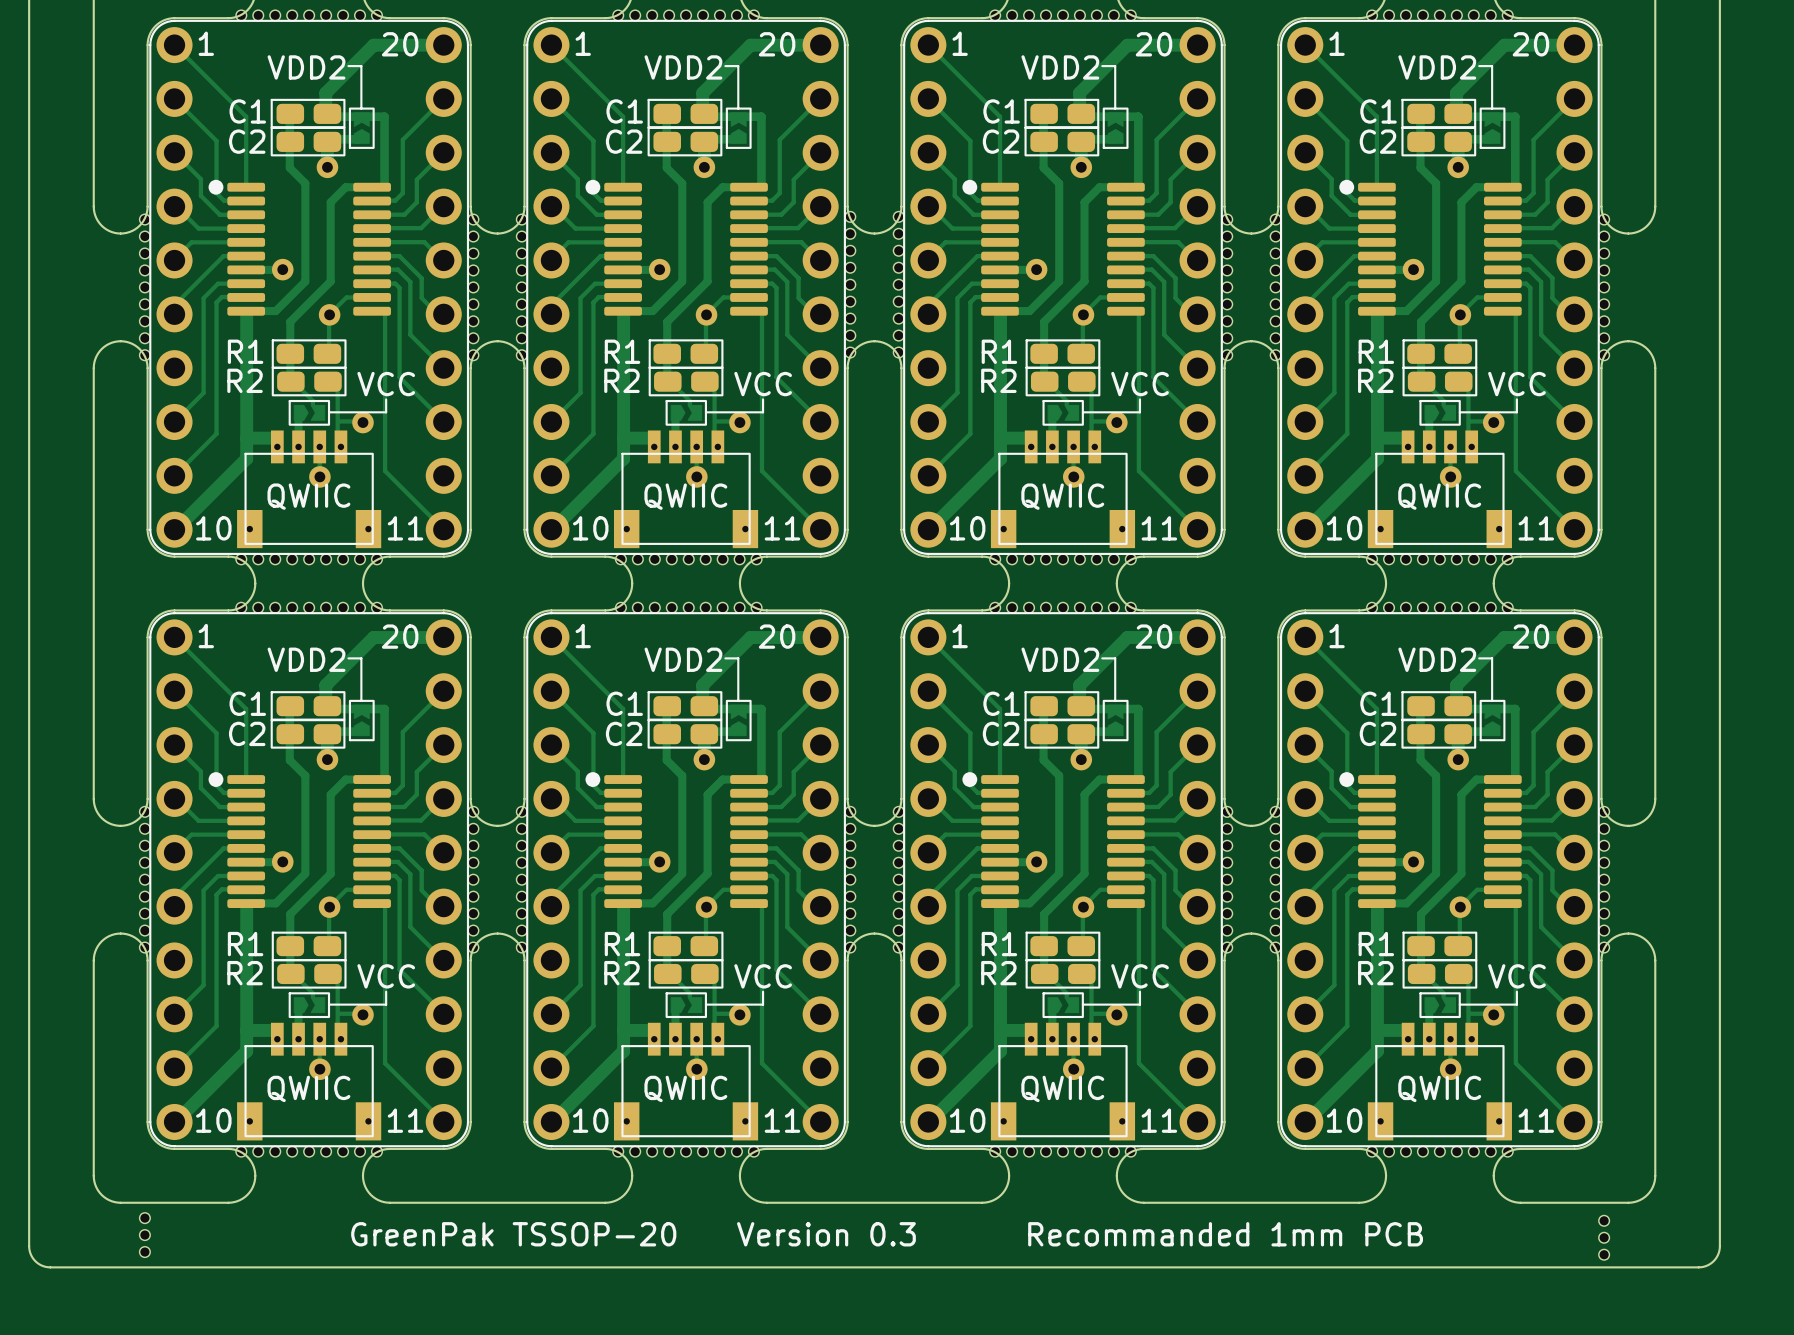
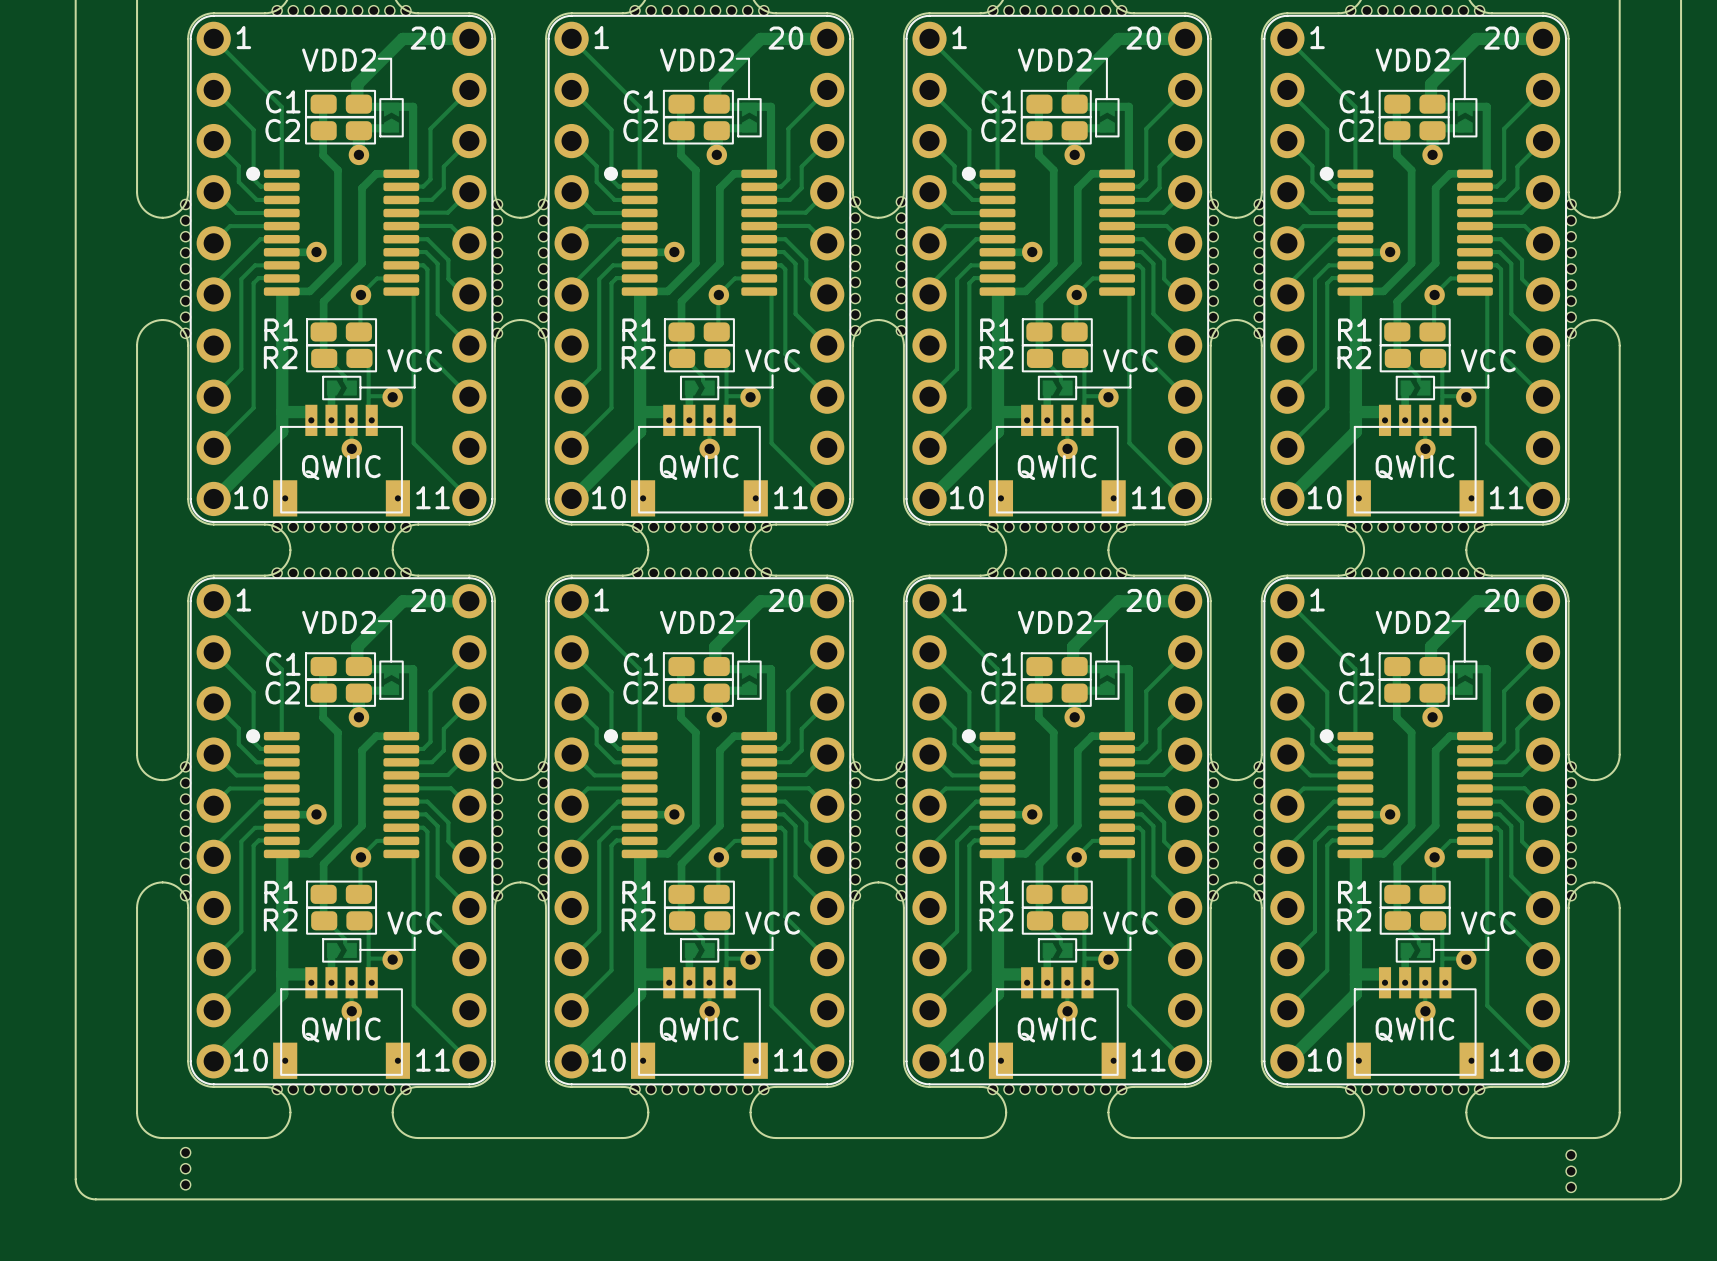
text: GreenPak TSSOP-20 (513, 1234) -> none
text: Version 0.3 (826, 1234) -> none
text: Recommanded 1mm PCB (1225, 1234) -> none

